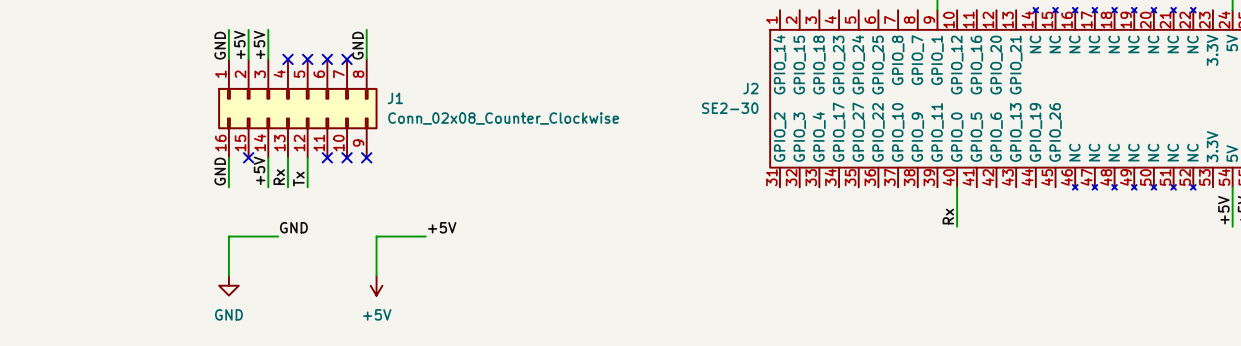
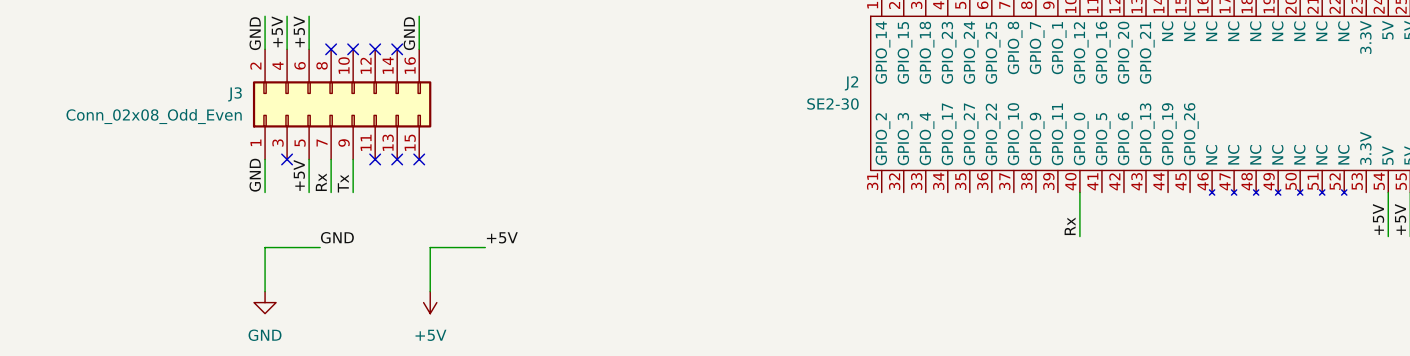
J1 symbol: [218, 59, 378, 158] -> [252, 49, 432, 160]
J1 name: J1 (395, 98) -> J3 (234, 94)
J1 value: Conn_02x08_Counter_Clockwise (503, 118) -> Conn_02x08_Odd_Even (154, 116)

